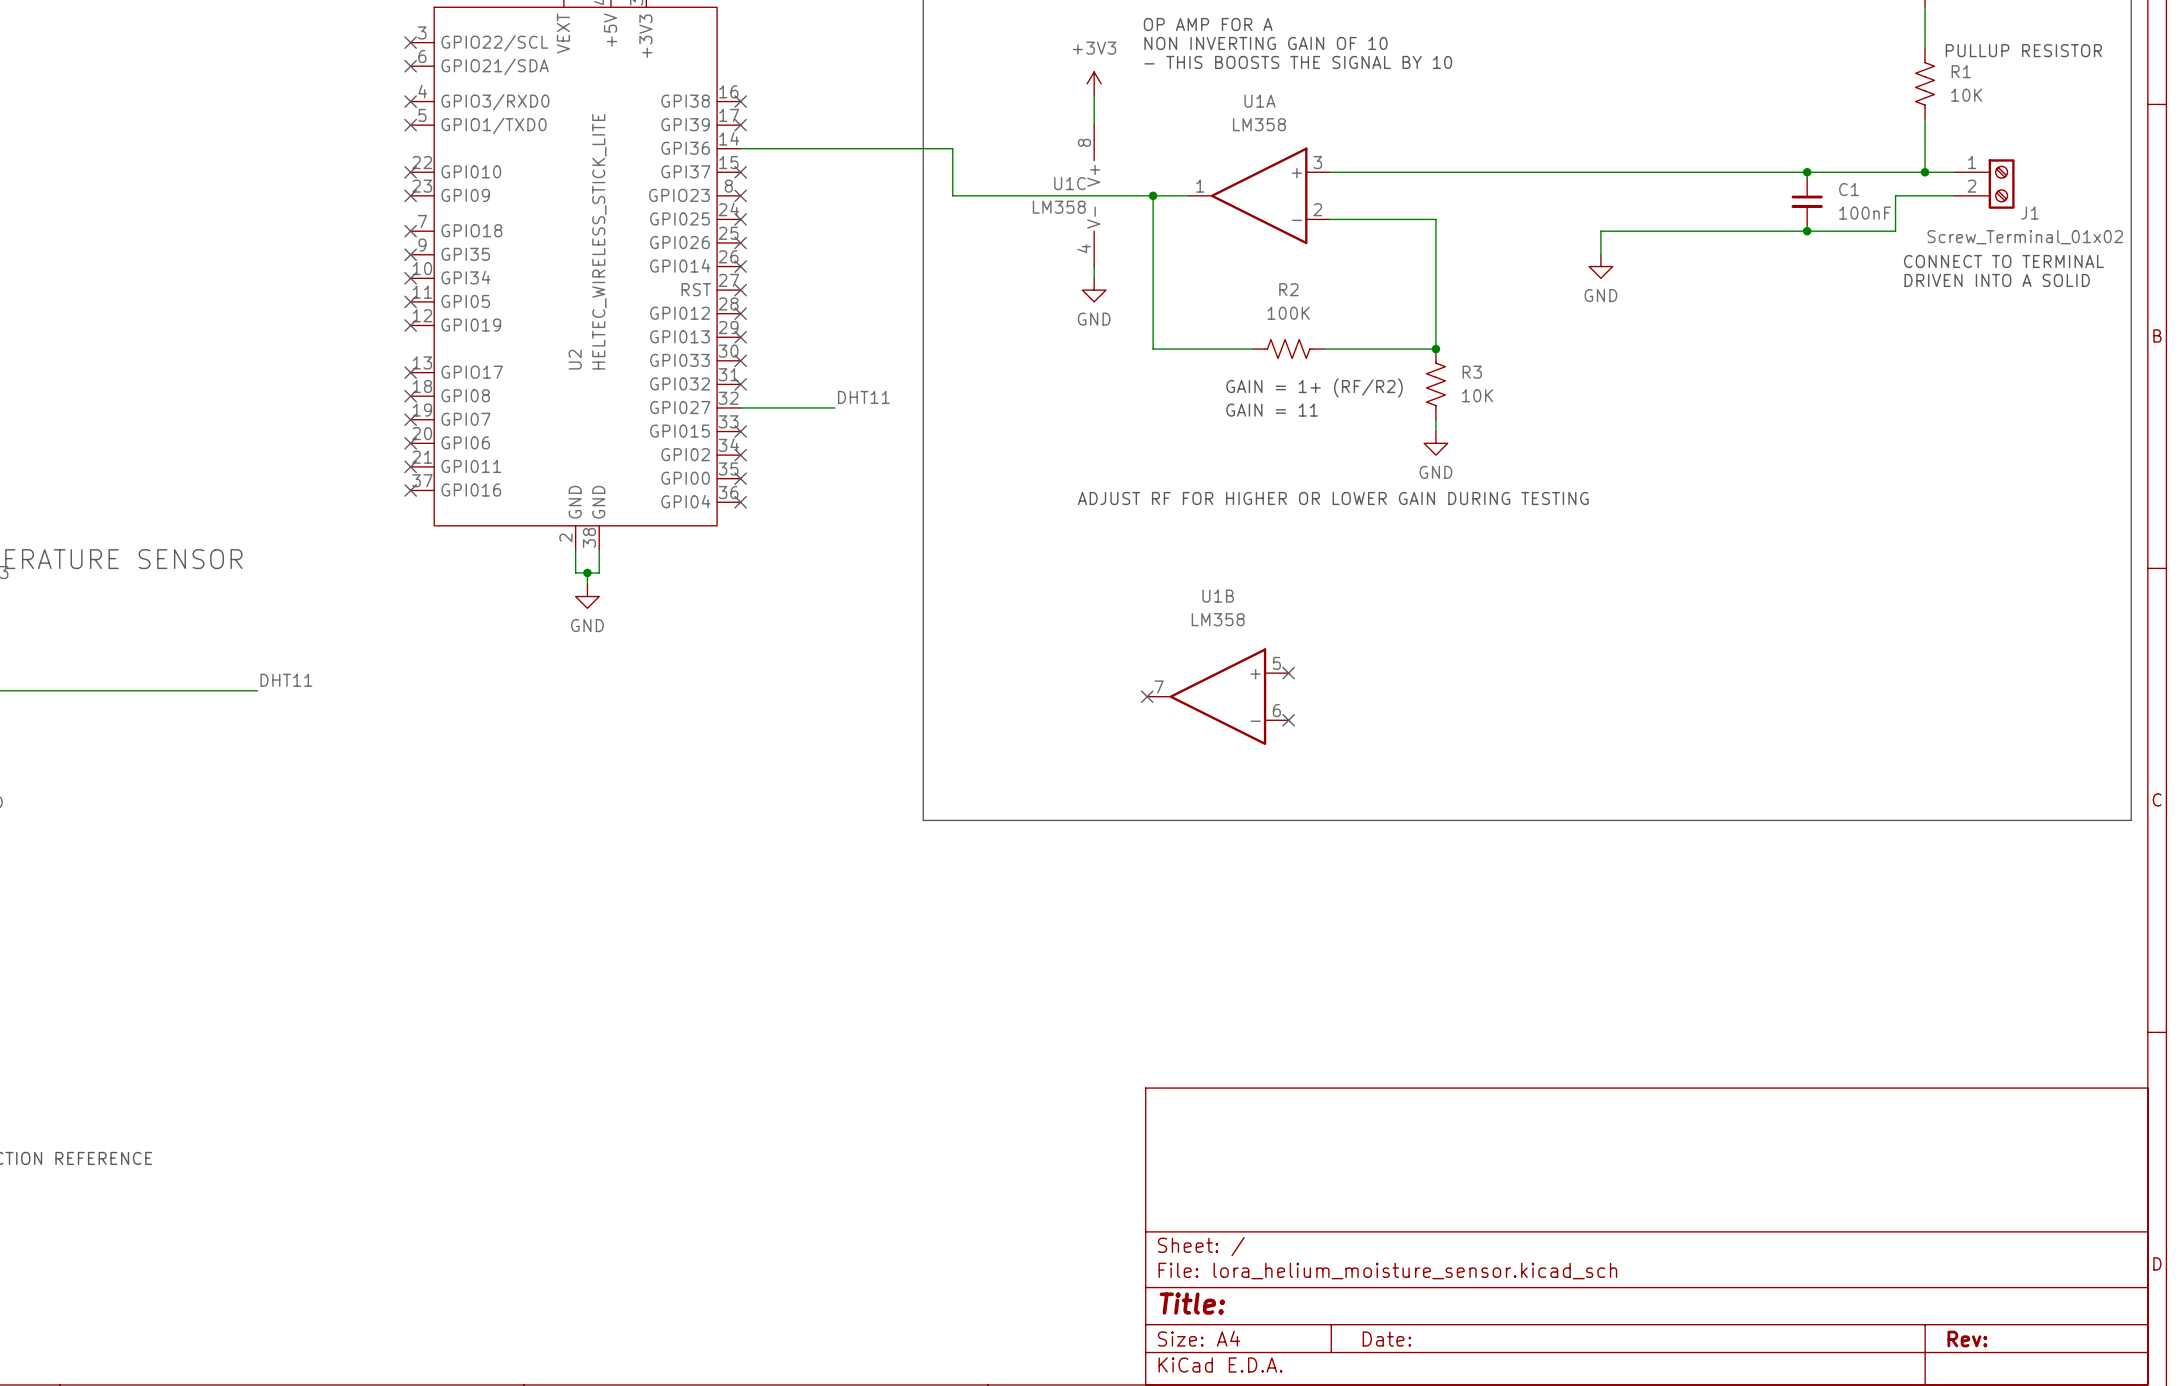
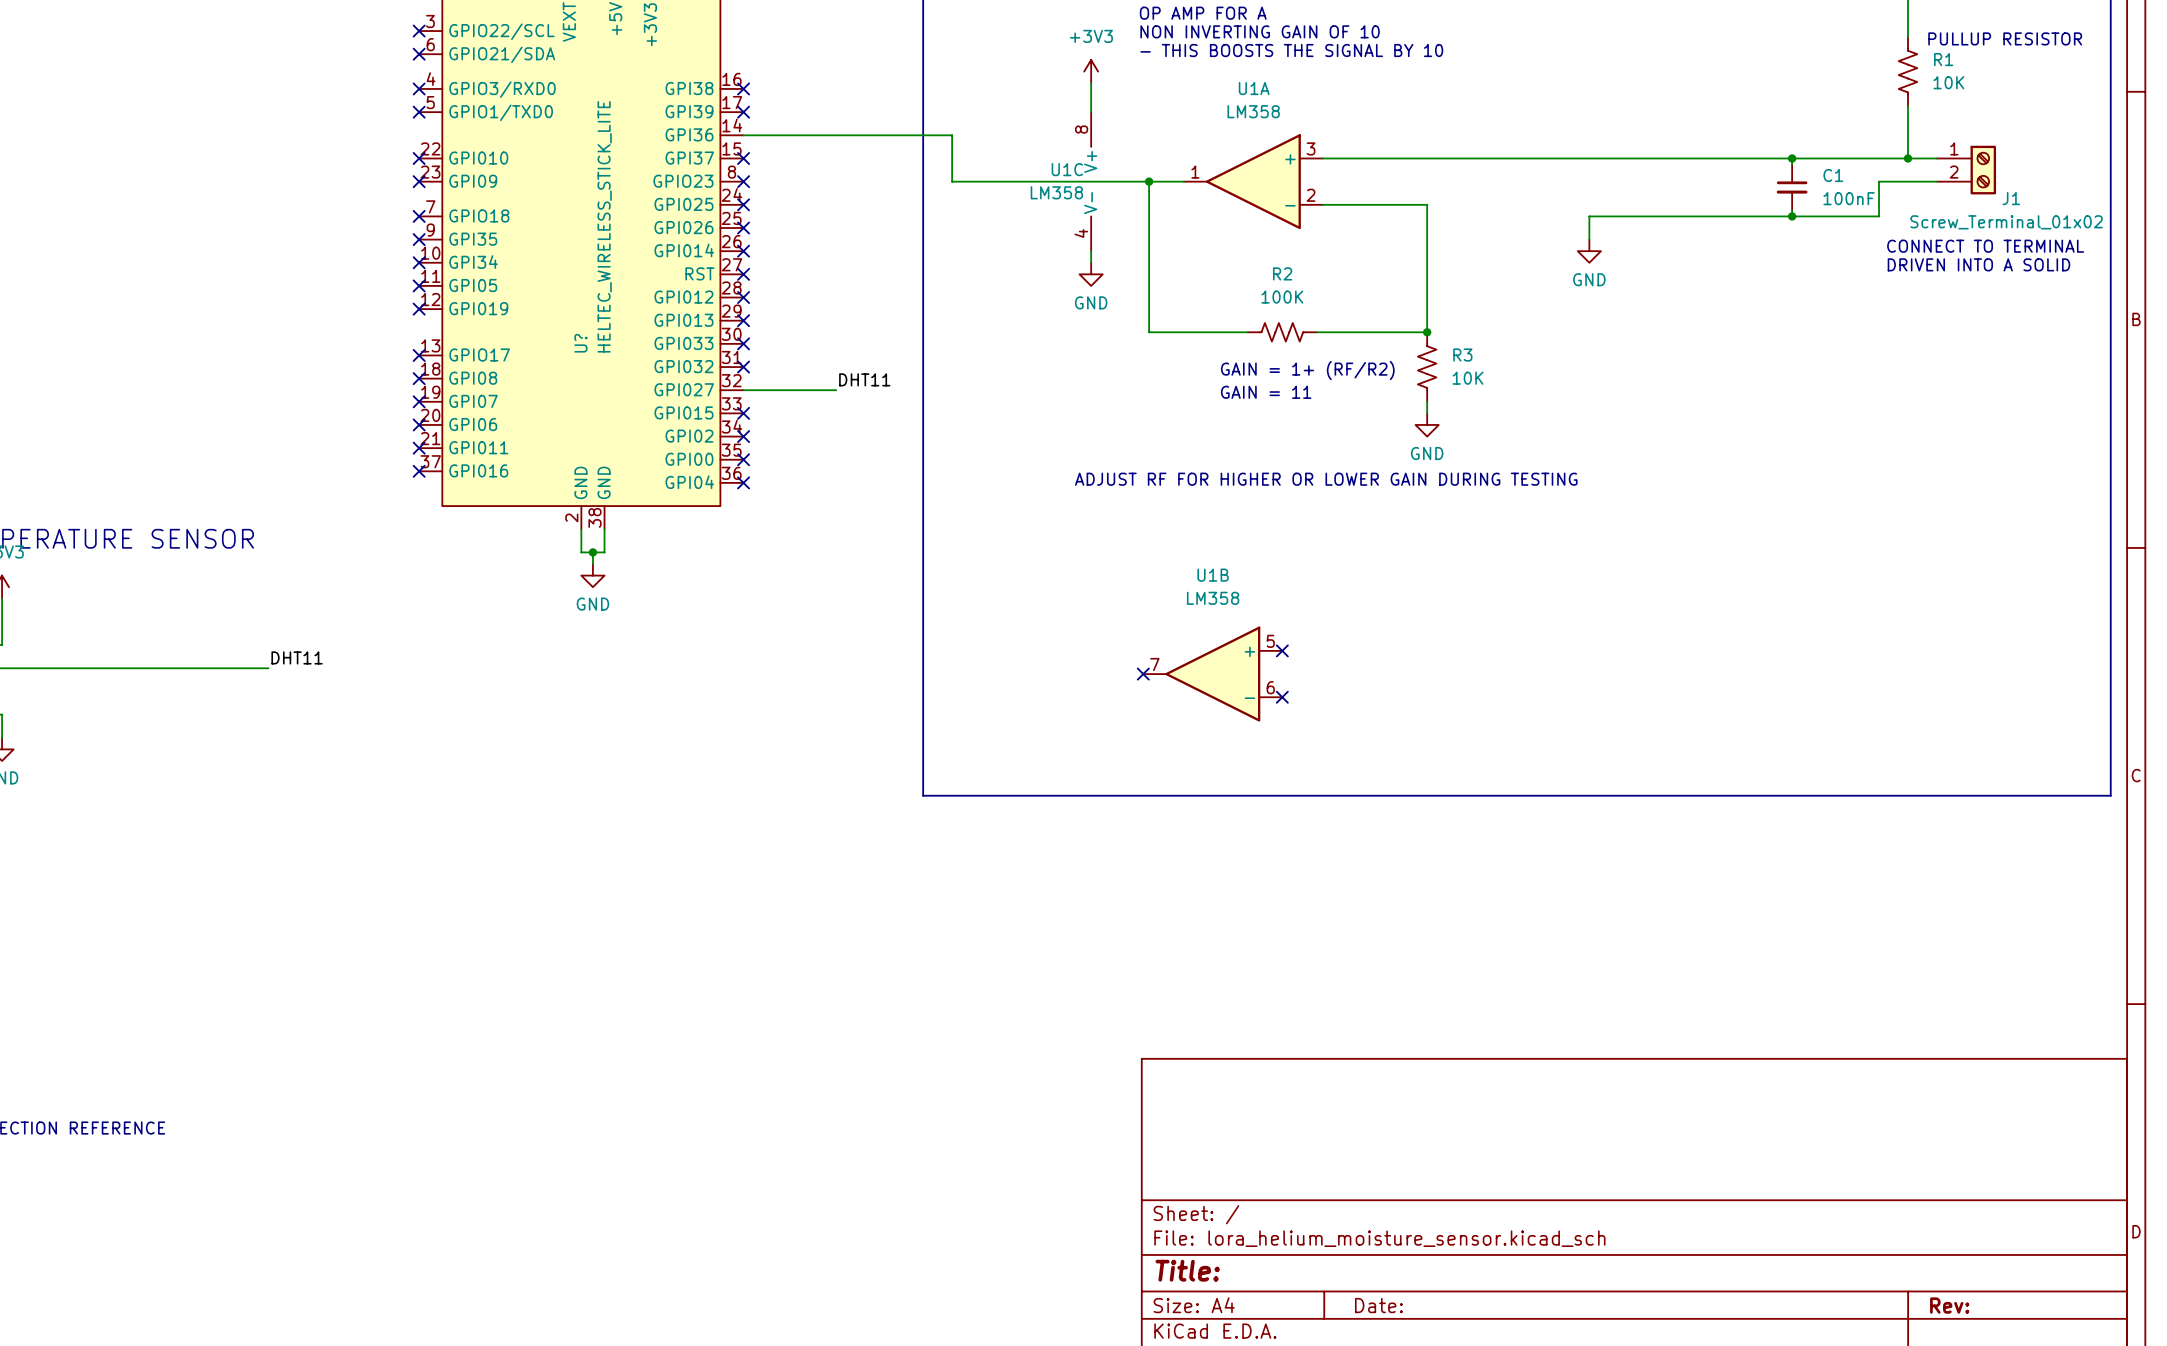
U2 name: U2 (575, 359) -> U? (580, 343)

